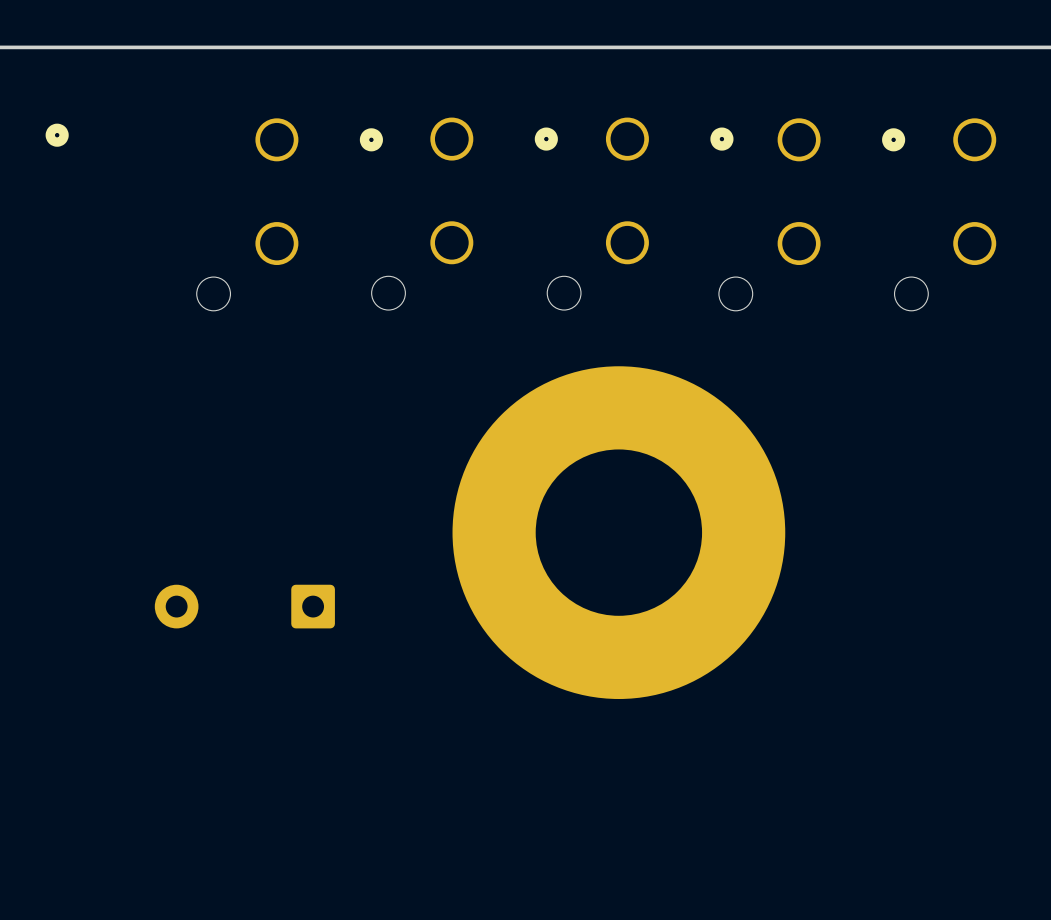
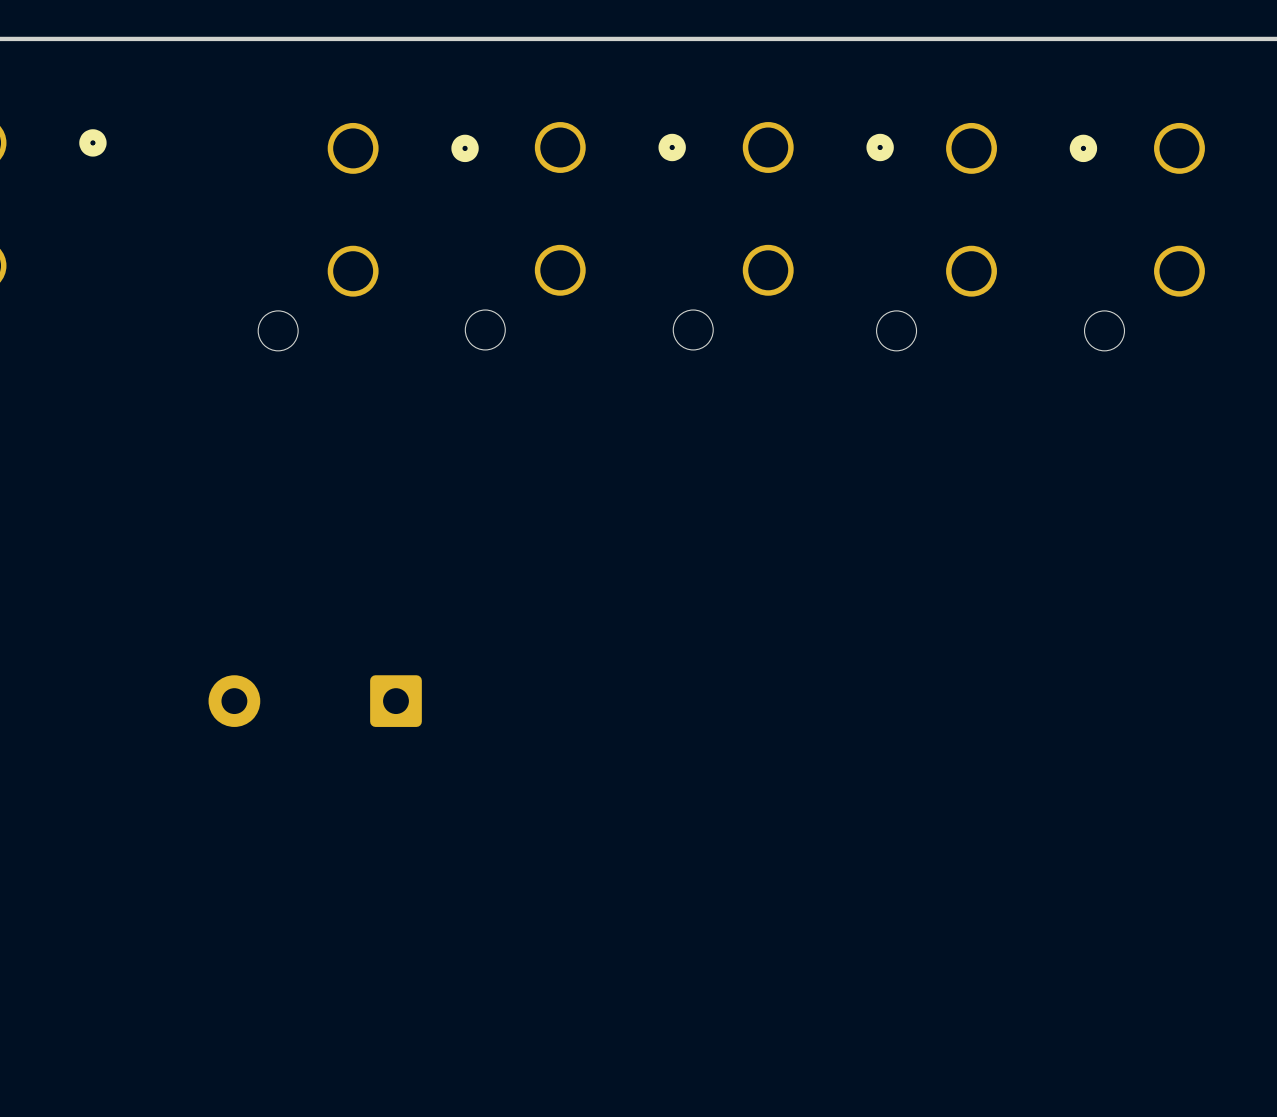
part: (618, 532) -> none

